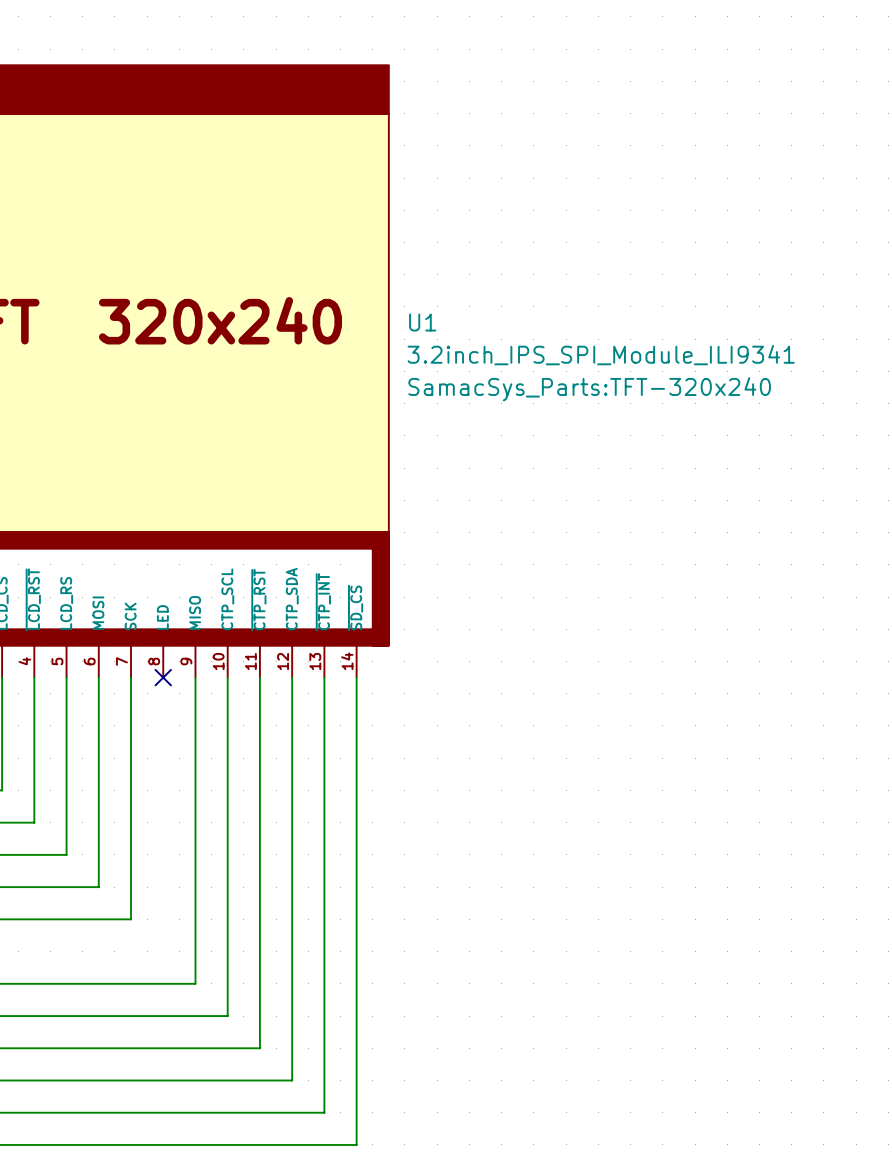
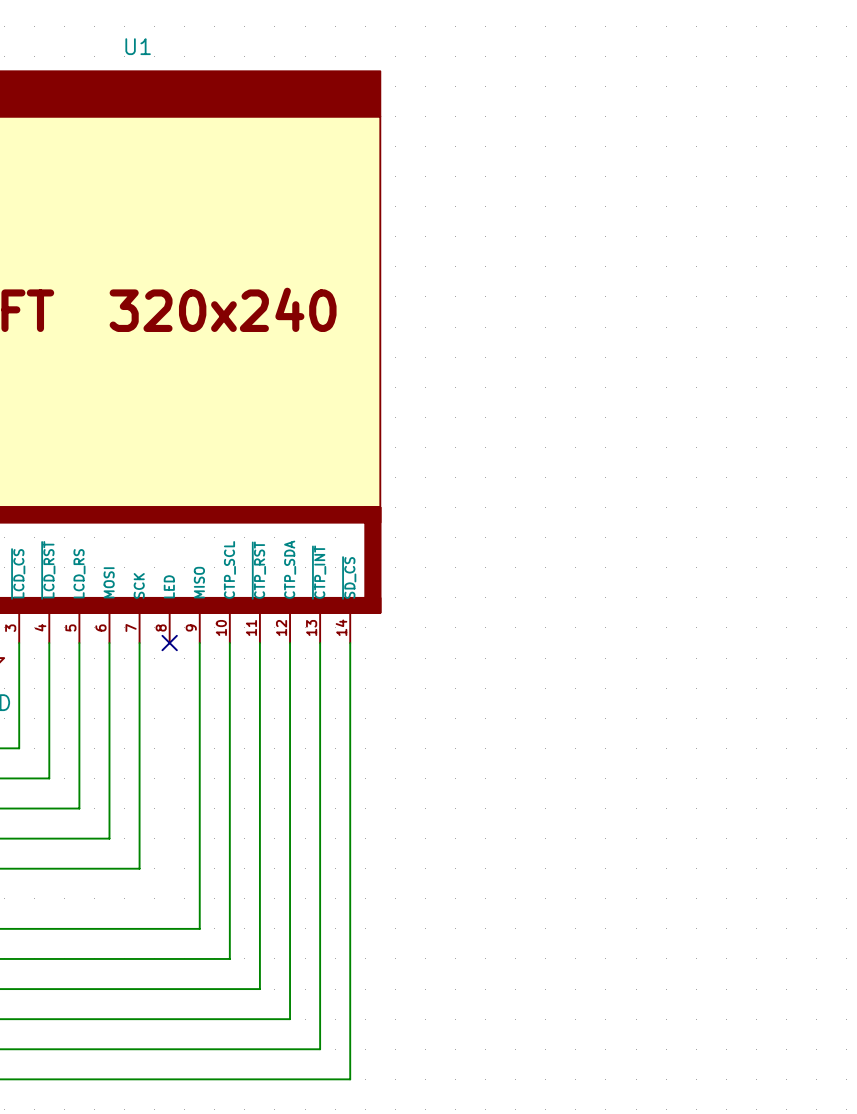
U1 name position: U1 (422, 322) -> U1 (138, 46)
U1 value: 3.2inch_IPS_SPI_Module_ILI9341 (601, 355) -> none
U1 text: SamacSys_Parts:TFT-320x240 (589, 389) -> none

